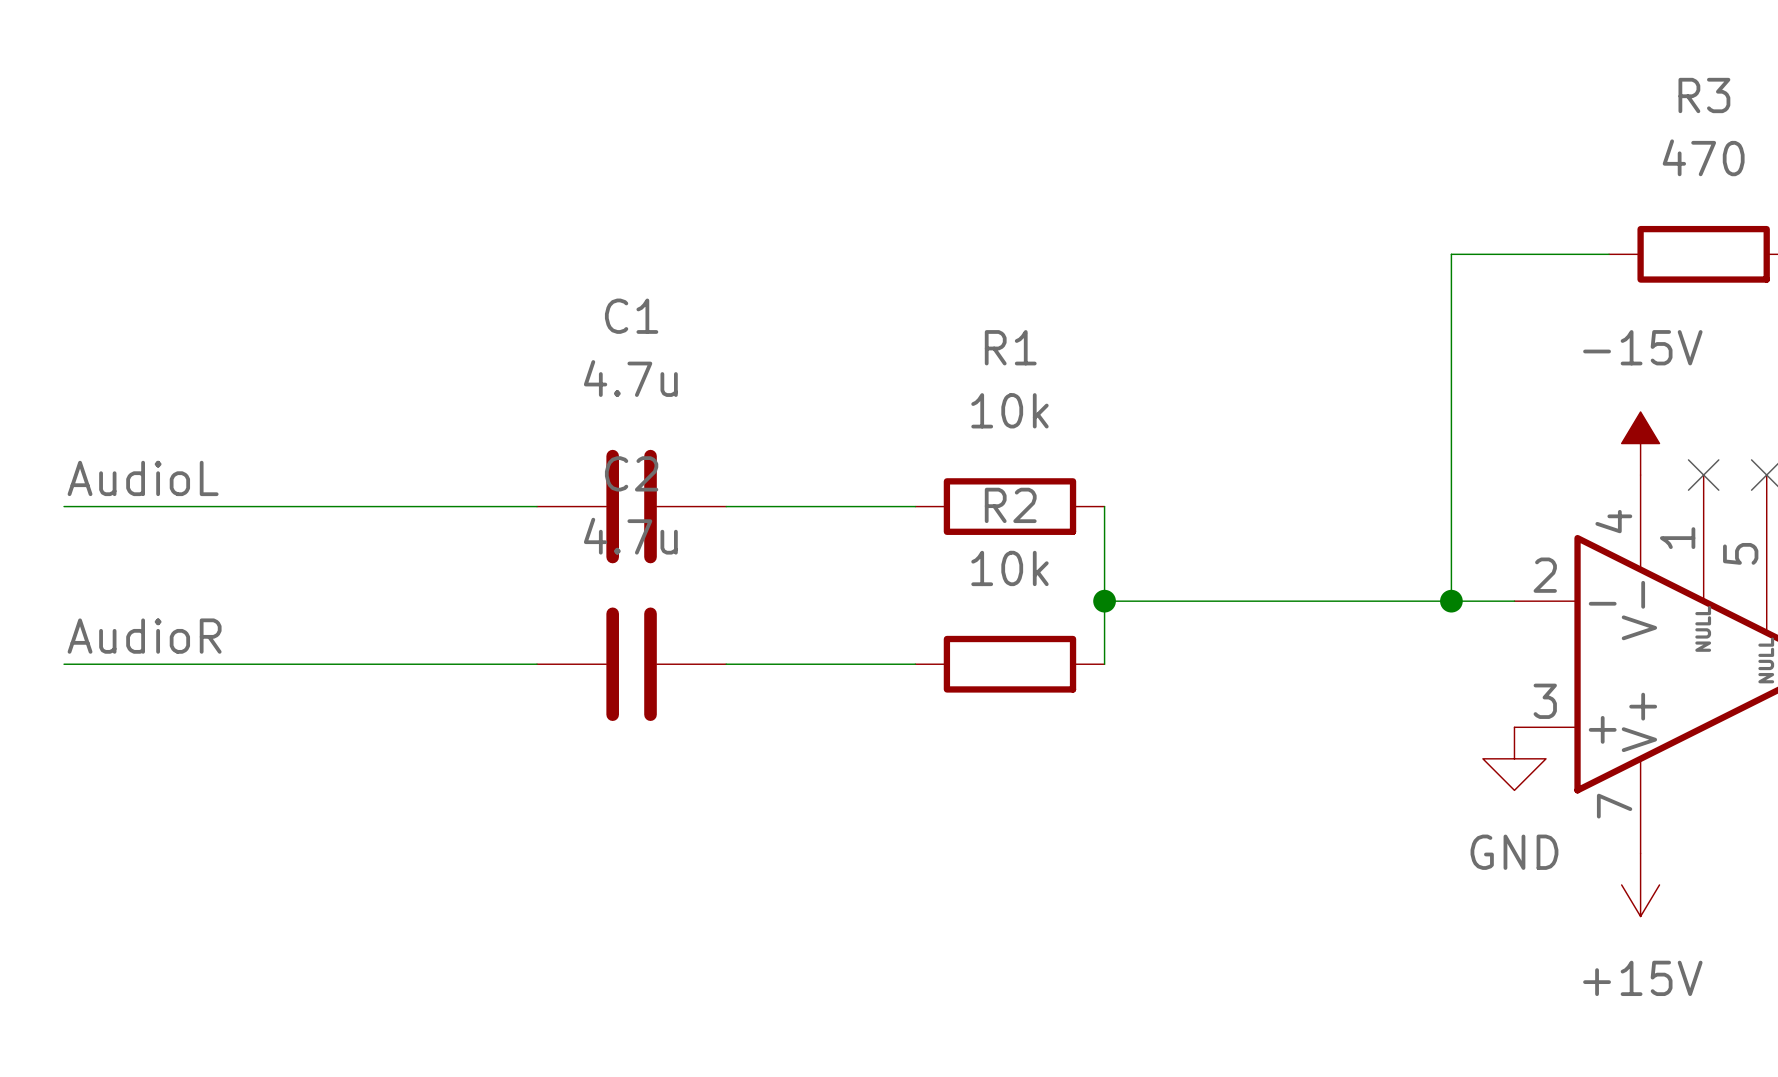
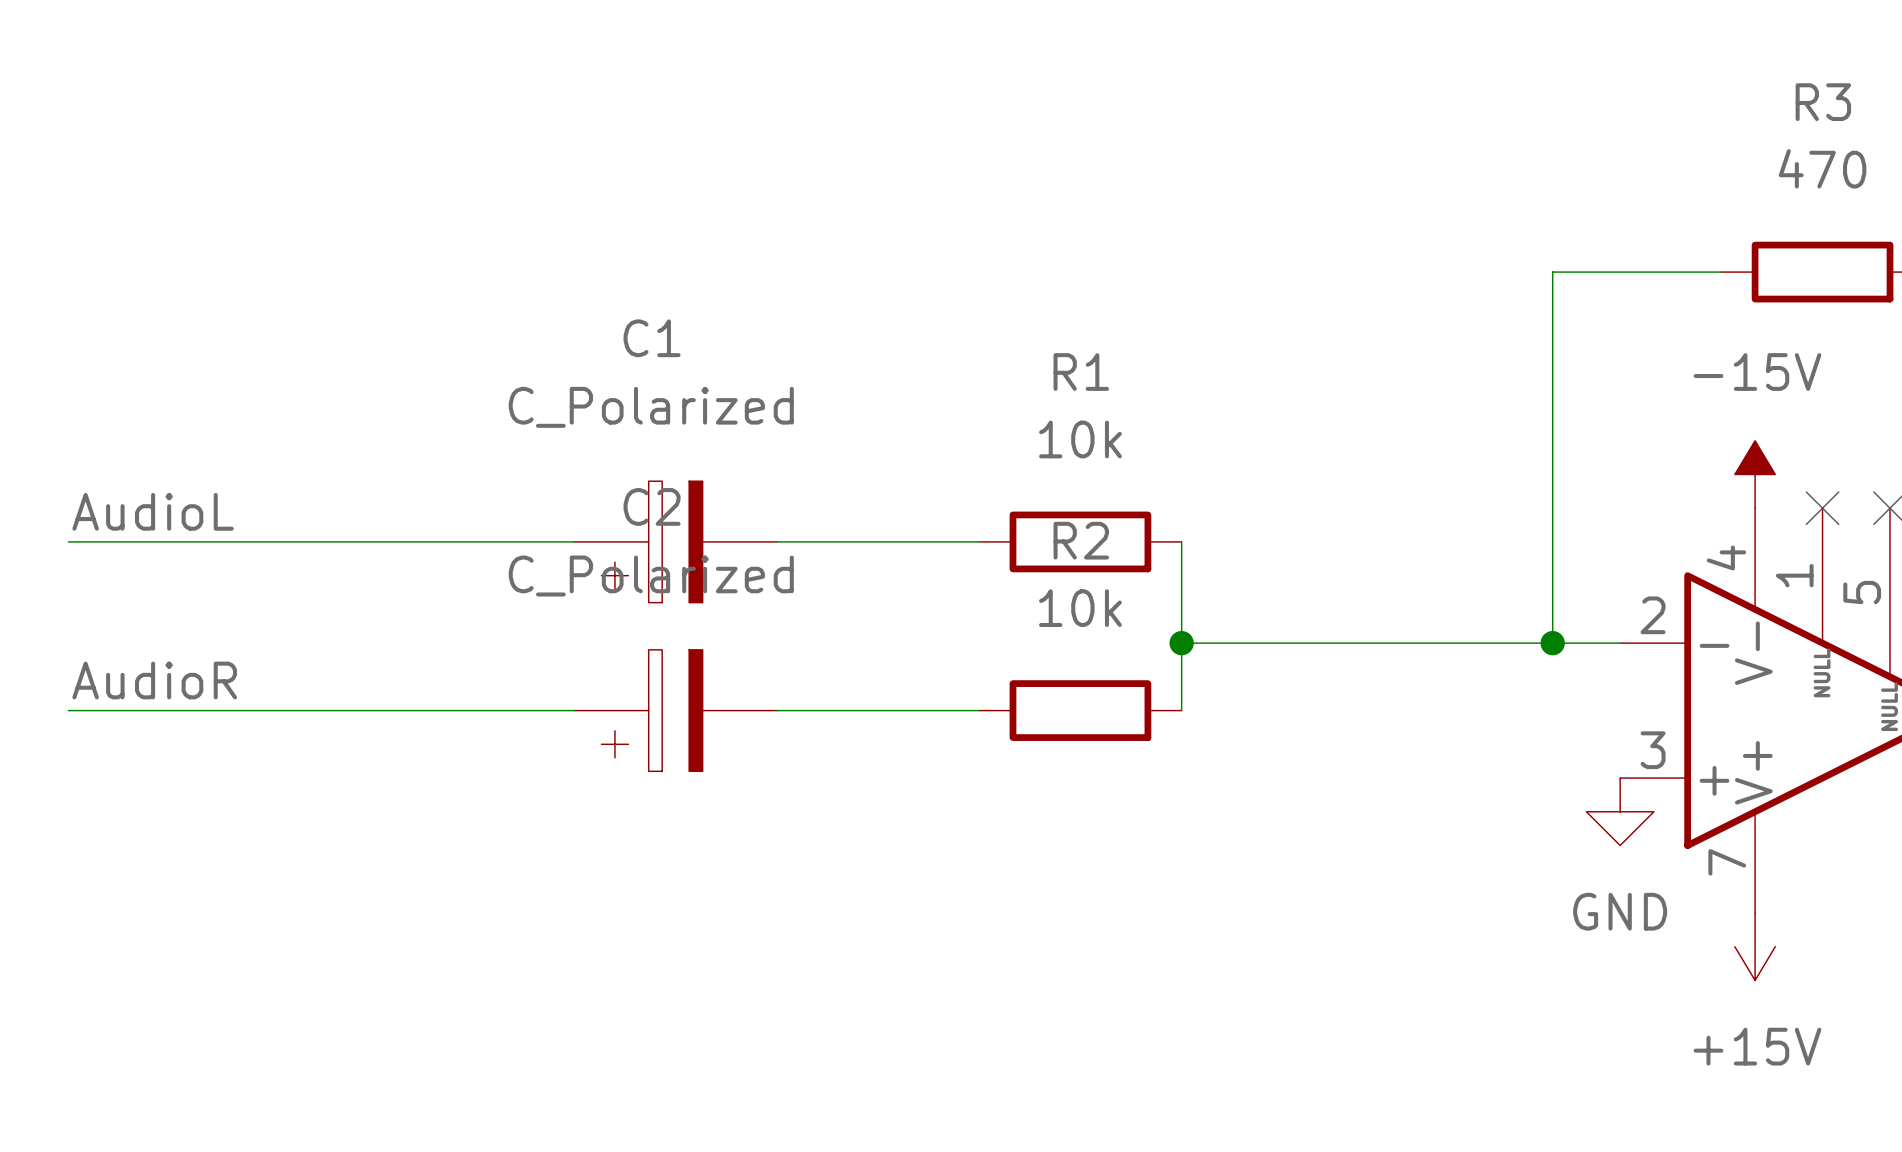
C1 value: 4.7u (630, 378) -> C_Polarized (651, 407)
C1 symbol: [537, 449, 727, 564] -> [574, 481, 777, 603]
C2 value: 4.7u (630, 536) -> C_Polarized (651, 576)
C2 symbol: [537, 607, 727, 721] -> [574, 649, 777, 772]

